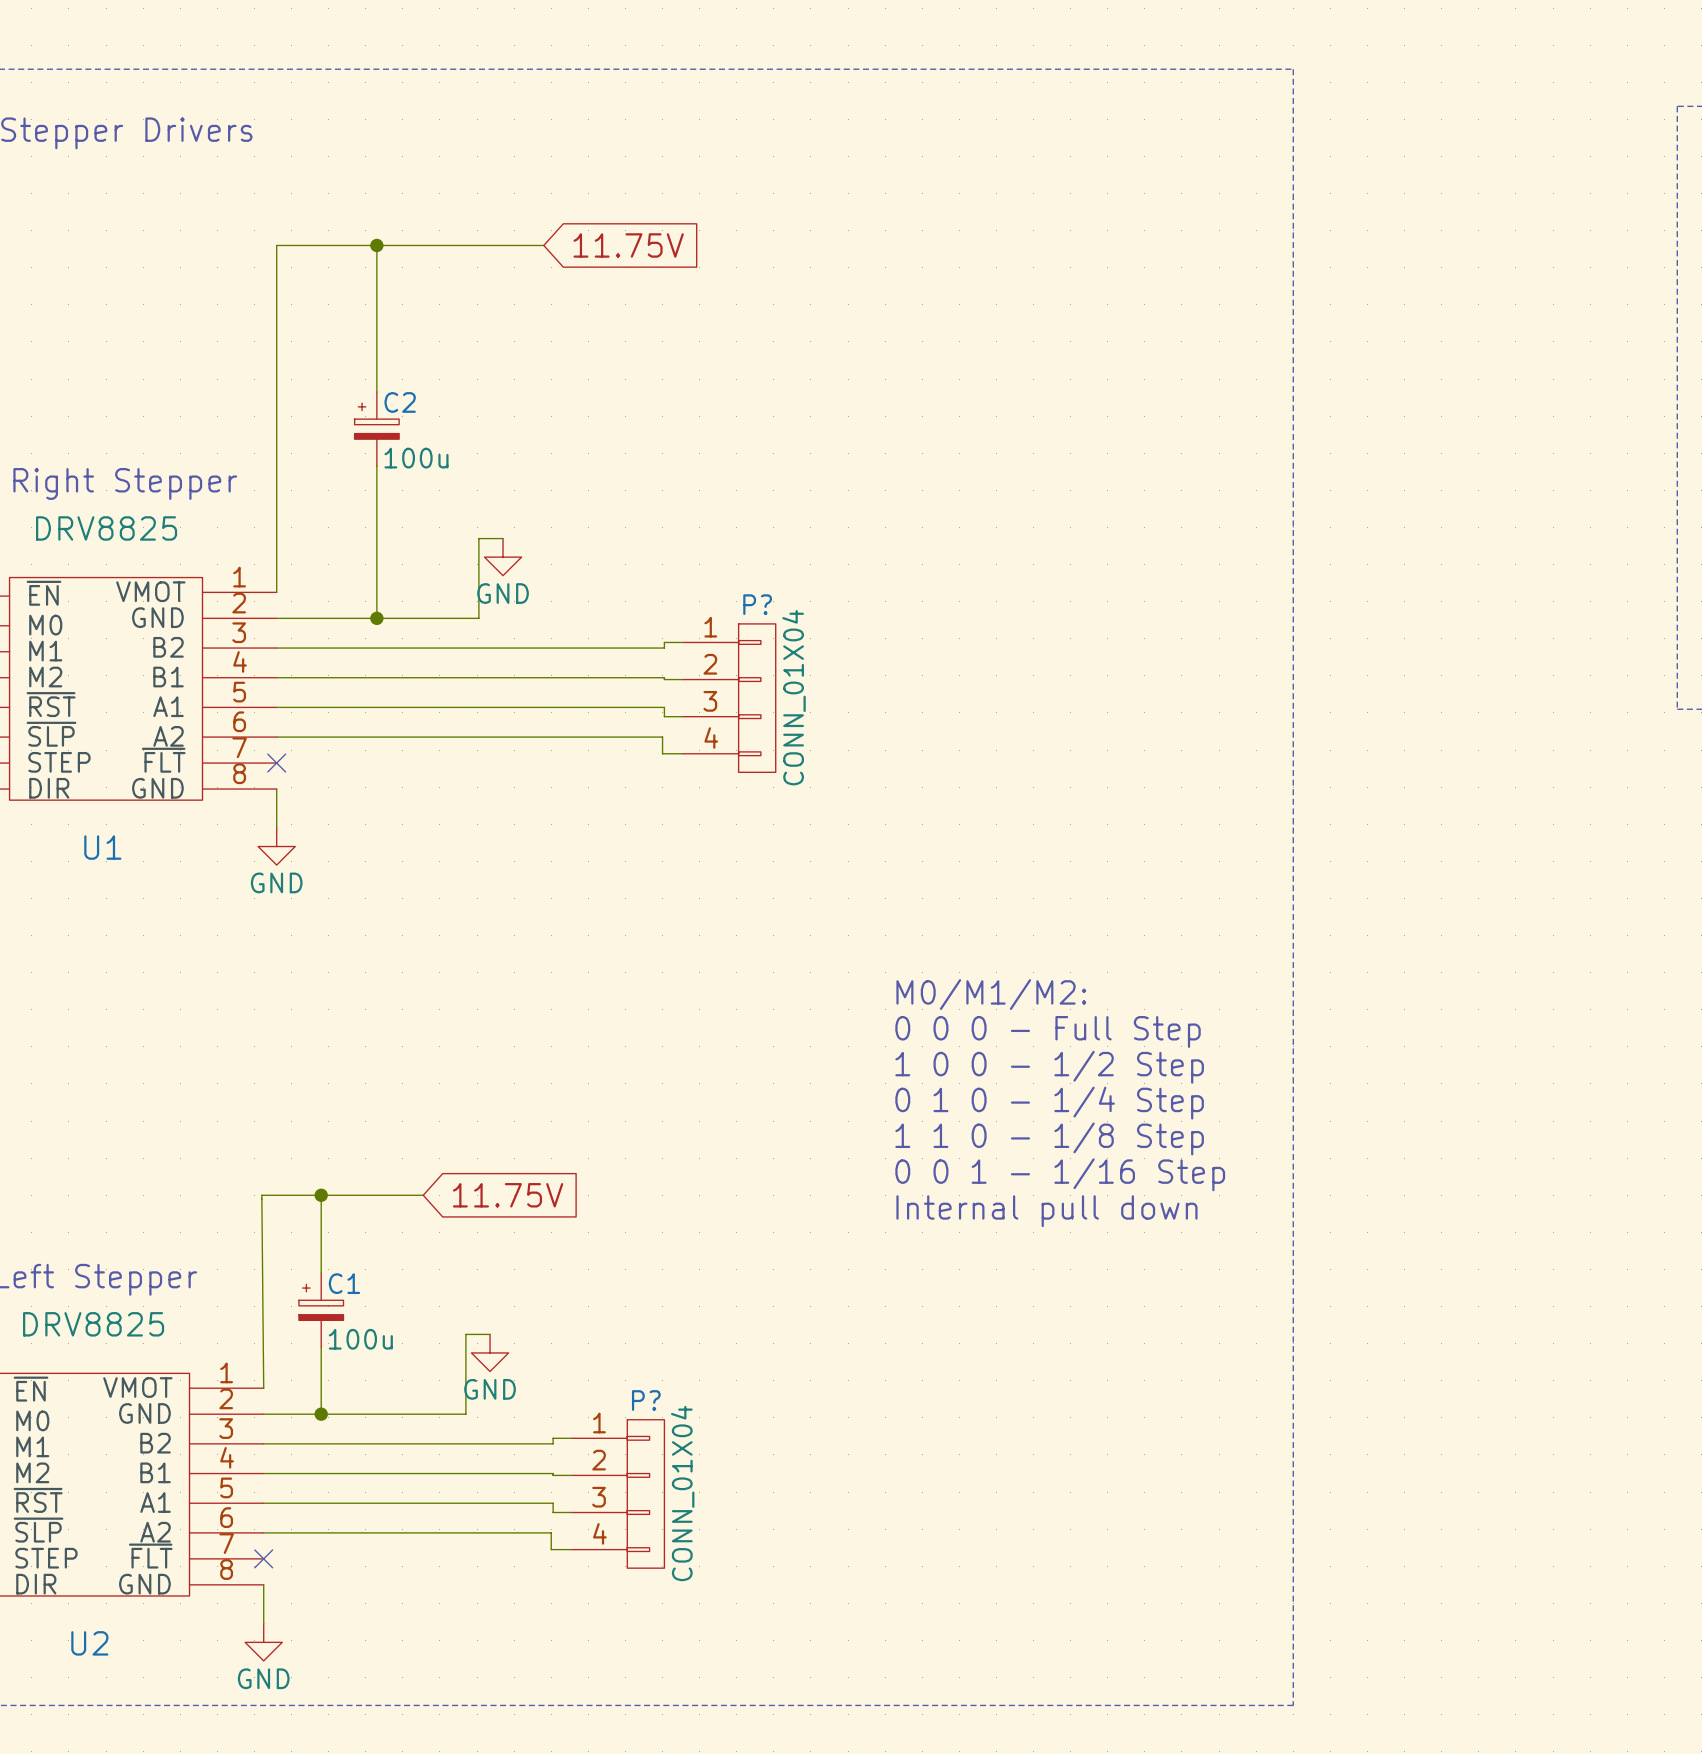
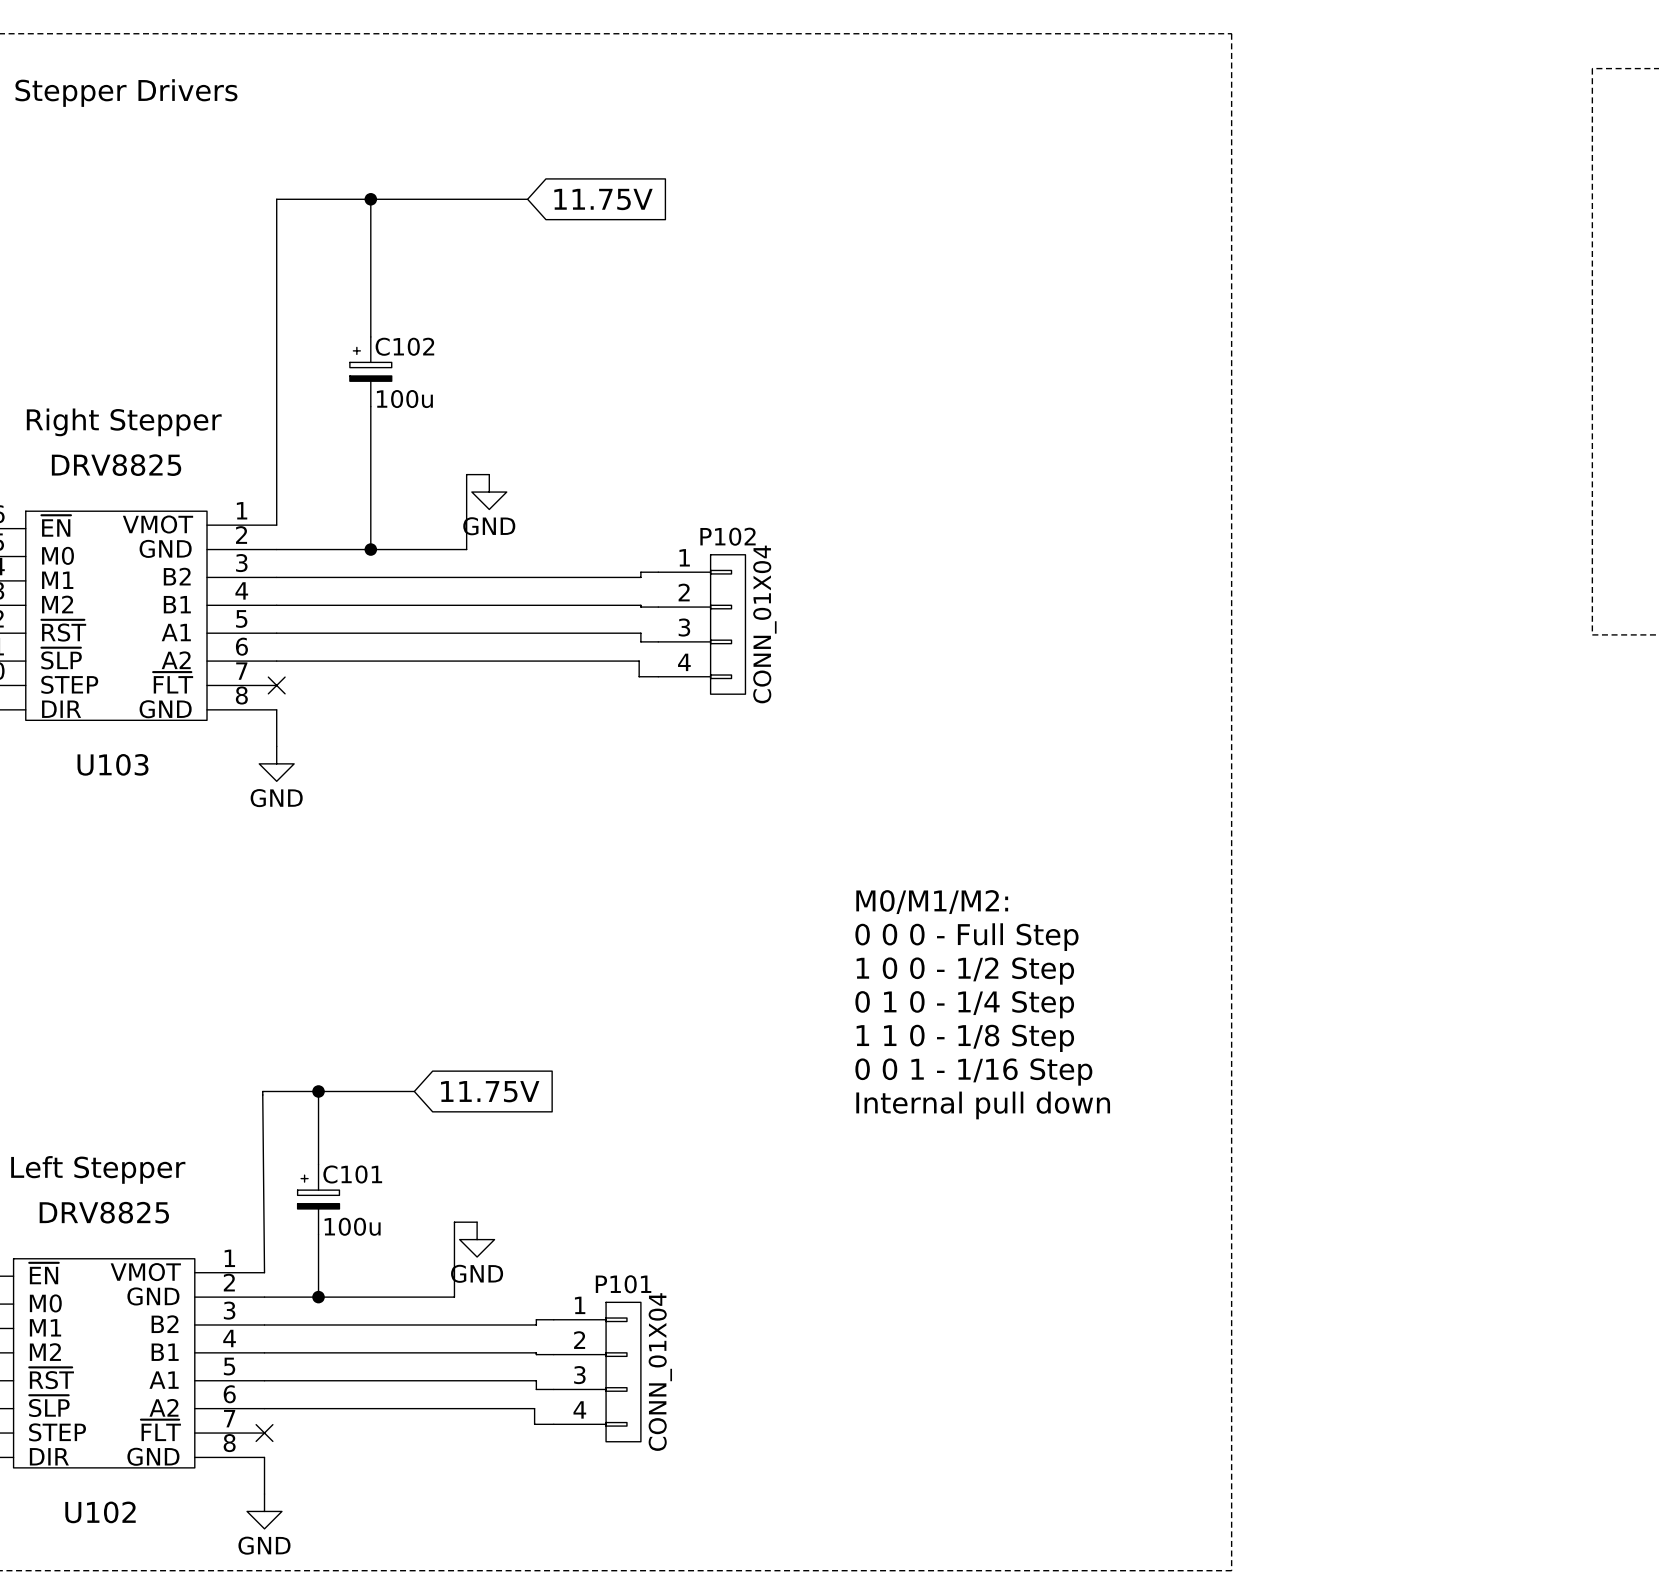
C2 name: C2 (400, 402) -> C102 (404, 346)
P? name: P? (757, 604) -> P102 (728, 536)
U1 name: U1 (102, 847) -> U103 (113, 764)
C1 name: C1 (344, 1283) -> C101 (352, 1174)
P? name: P? (646, 1400) -> P101 (623, 1284)
U2 name: U2 (89, 1643) -> U102 (100, 1512)

